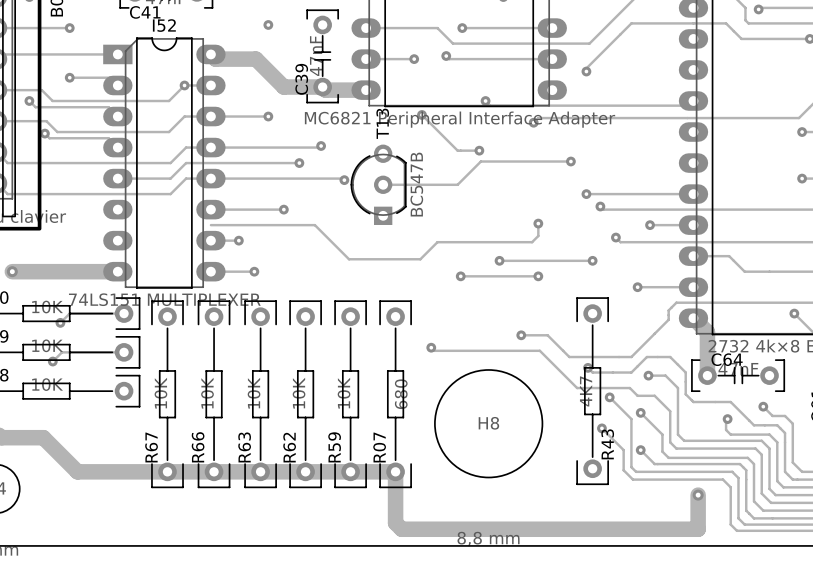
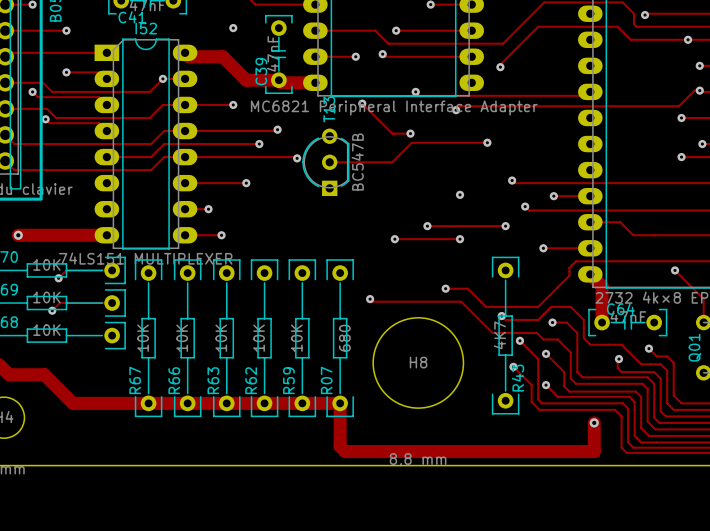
track: (586, 194) (693, 194) -> none
via: (586, 194) -> none
track: (538, 223) (538, 235) (532, 242) (437, 242) (420, 259) (349, 259) (314, 225) (210, 225) -> none

